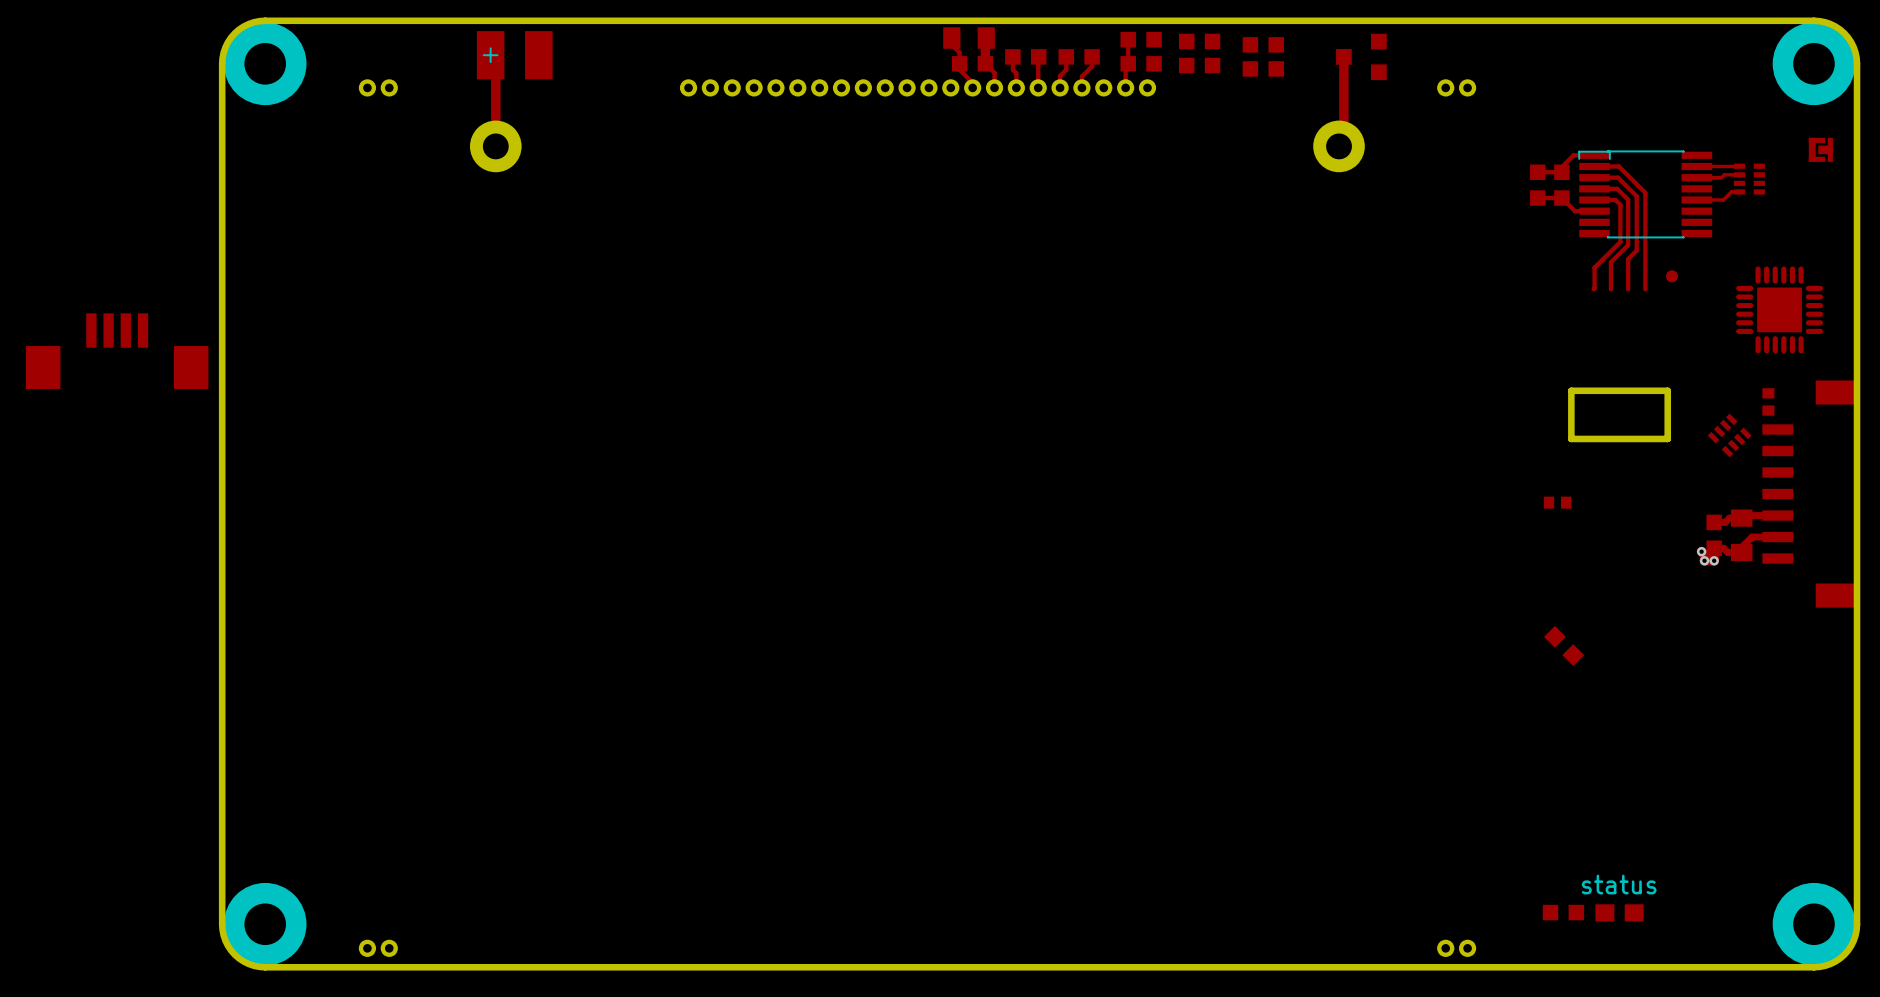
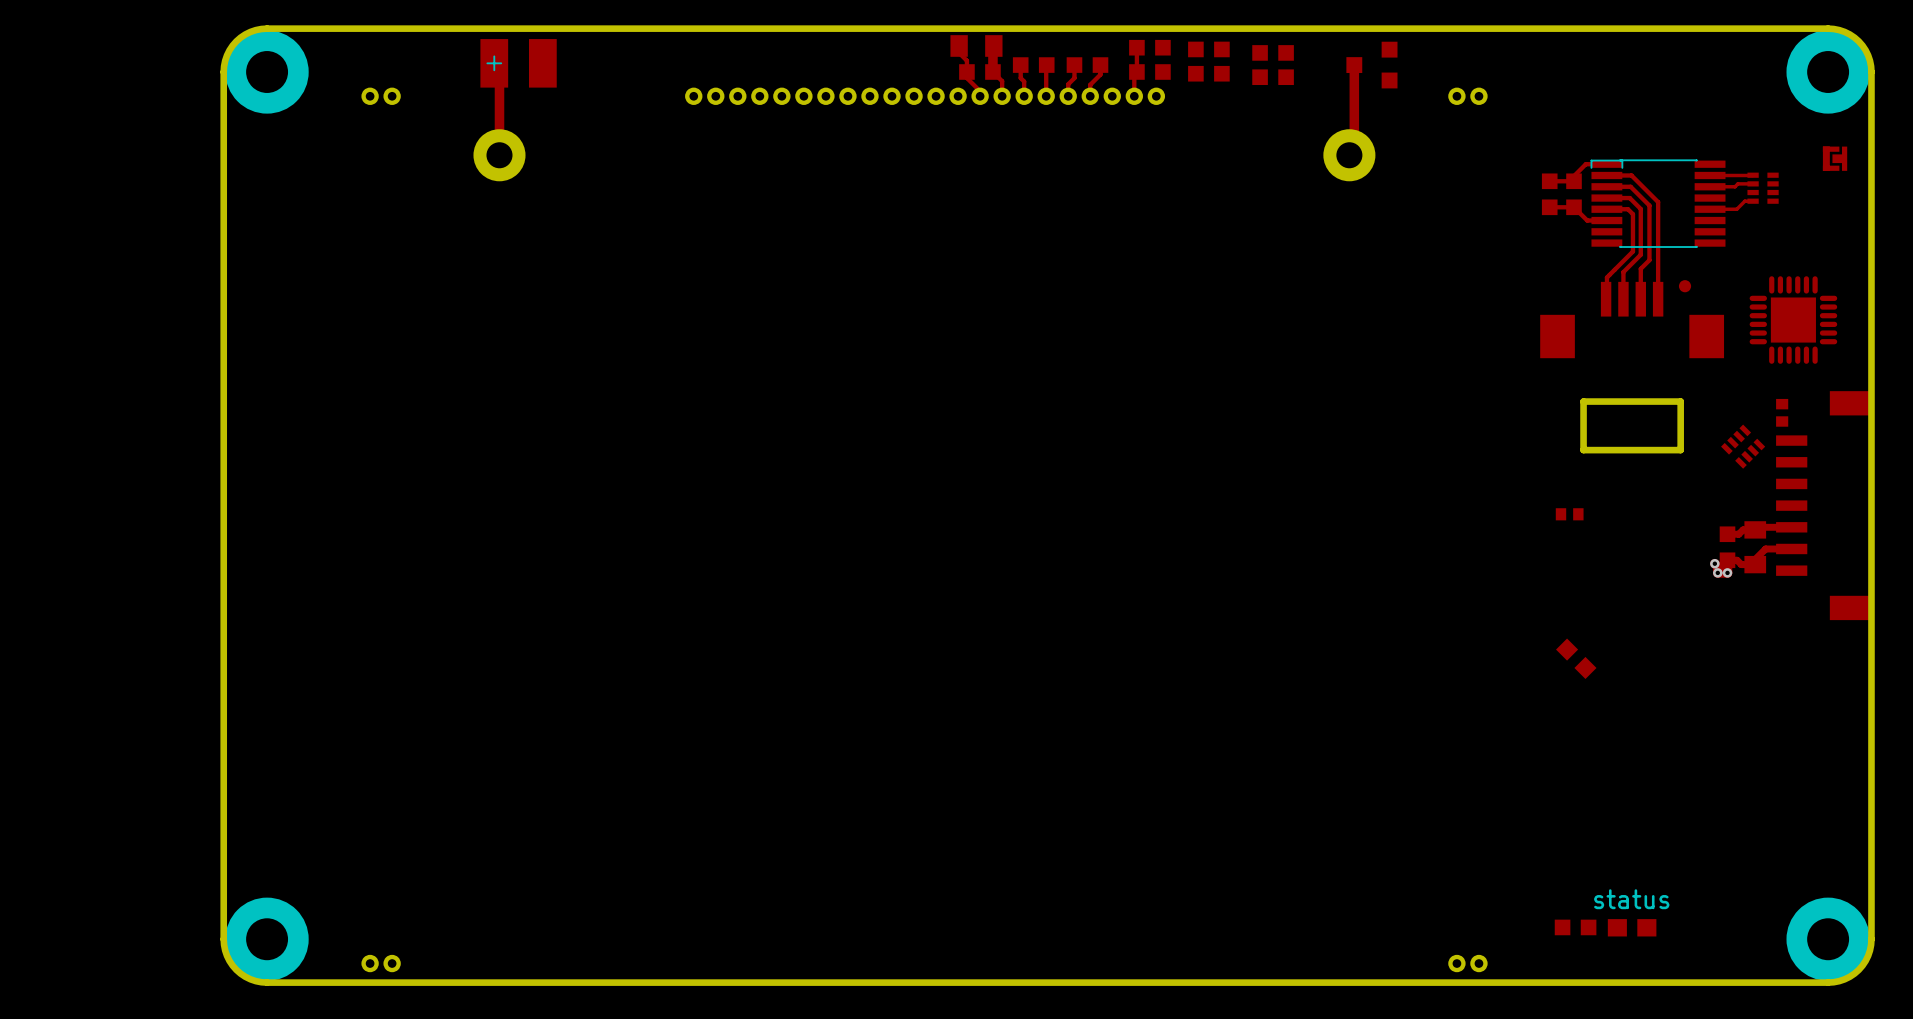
part: none -> (1632, 320)
part: (117, 351) -> none

